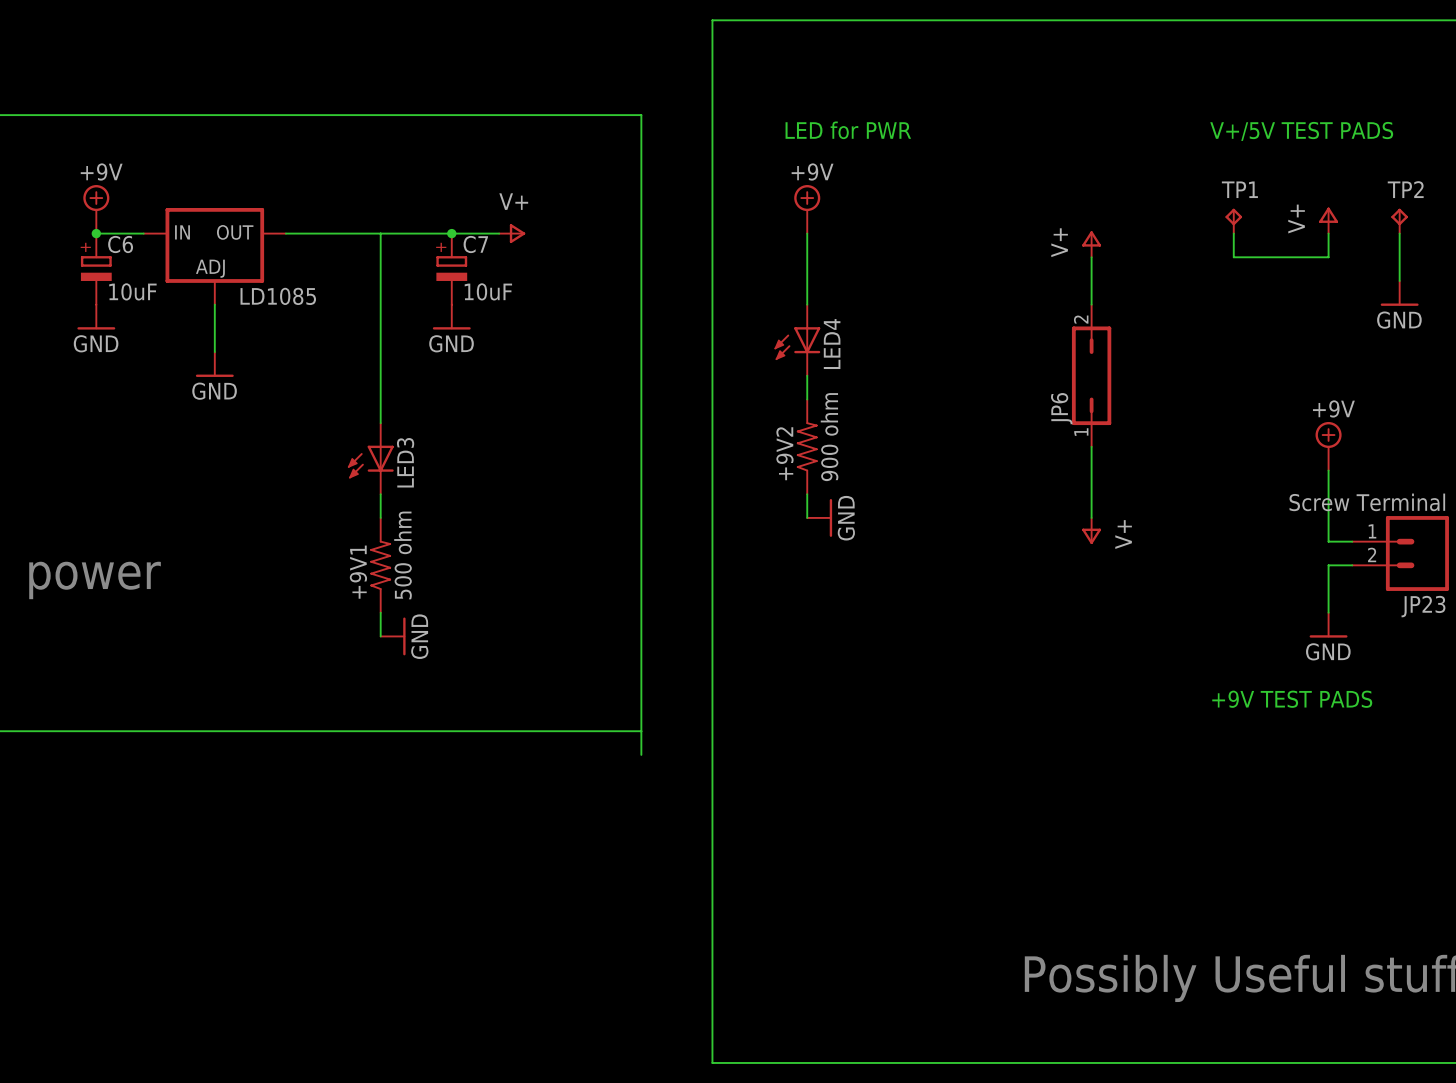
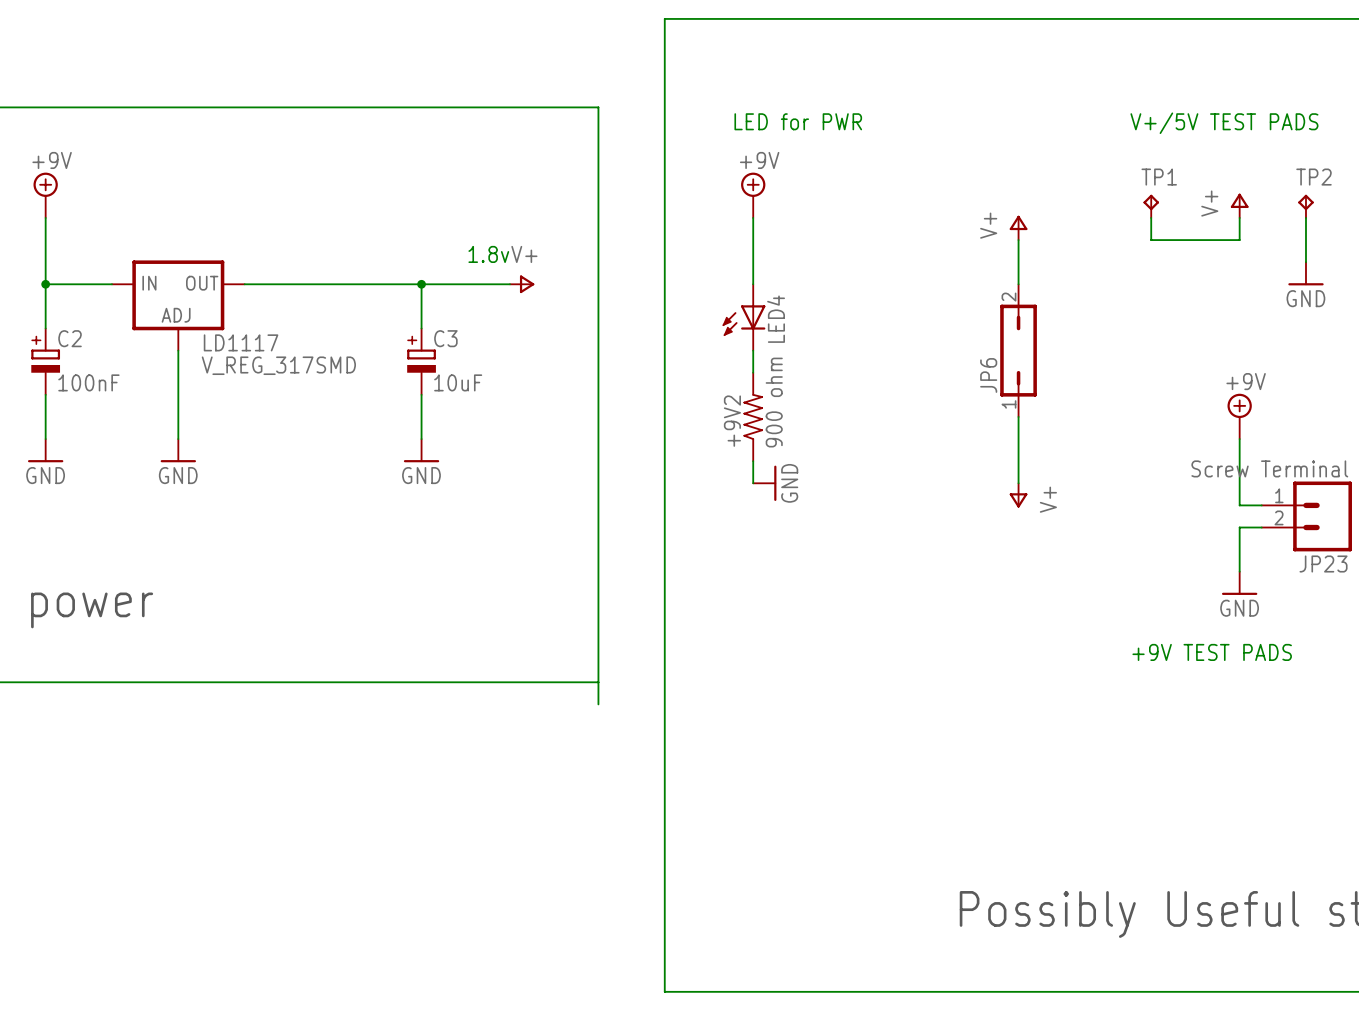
power symbol position: +9V (96, 209) -> +9V (45, 195)
wire: none -> (45, 217) (45, 328)
wire: (96, 233) (143, 233) -> none
junction: (96, 233) -> none
wire: (285, 233) (499, 233) -> none
wire: (380, 233) (380, 423) -> none
junction: (451, 233) -> none
power symbol position: V+ (512, 233) -> V+ (522, 284)
LD1085: (214, 256) -> none
C6: 10uF (96, 269) -> none
C7: 10uF (451, 269) -> none
text: none -> 1.8v (488, 254)
wire: none -> (45, 284) (111, 284)
junction: none -> (45, 284)
wire: (214, 304) (214, 352) -> (45, 394) (45, 439)
wire: none -> (244, 284) (509, 284)
junction: none -> (421, 284)
power symbol: GND (96, 317) -> none
power symbol: GND (451, 317) -> none
LD1117: none -> V_REG_317SMD (178, 305)
power symbol: GND (214, 364) -> none
wire: none -> (178, 350) (178, 439)
C2: none -> 100nF (45, 361)
C3: none -> 10uF (421, 361)
wire: none -> (421, 394) (421, 439)
LED3: (370, 458) -> none
power symbol: none -> GND (45, 450)
power symbol: none -> GND (178, 450)
power symbol: none -> GND (421, 450)
wire: (380, 494) (380, 517) -> none
+9V1: 500 ohm (380, 565) -> none
text position: power (95, 580) -> power (92, 610)
wire: (380, 612) (380, 636) -> none
power symbol: GND (393, 636) -> none

